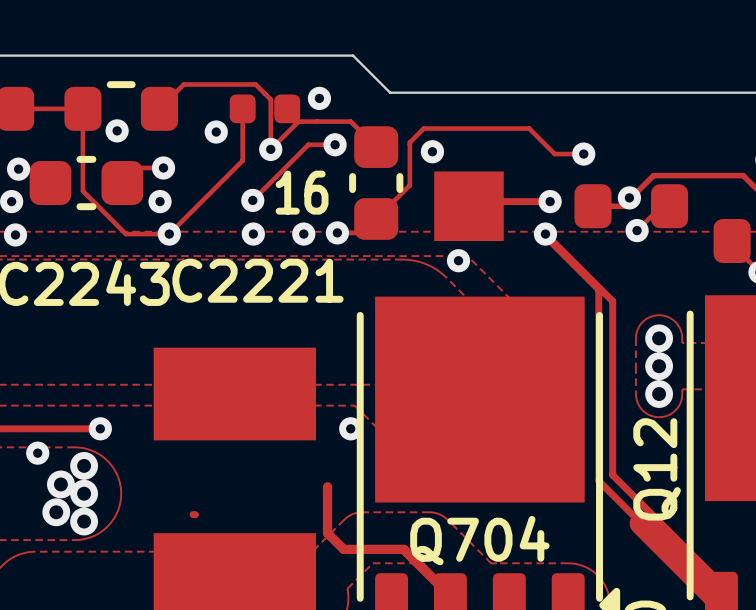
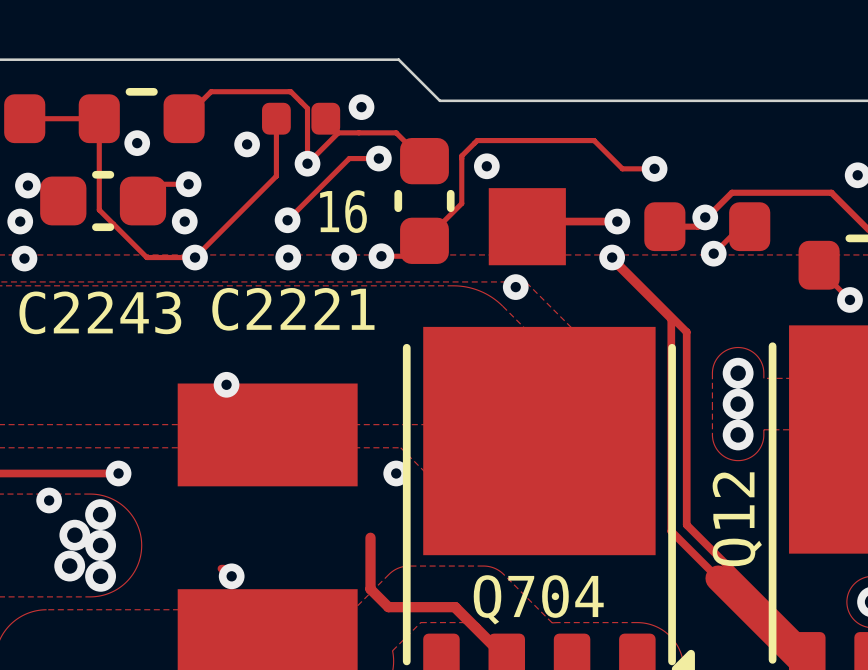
via: none -> (226, 384)
via: none -> (231, 576)

